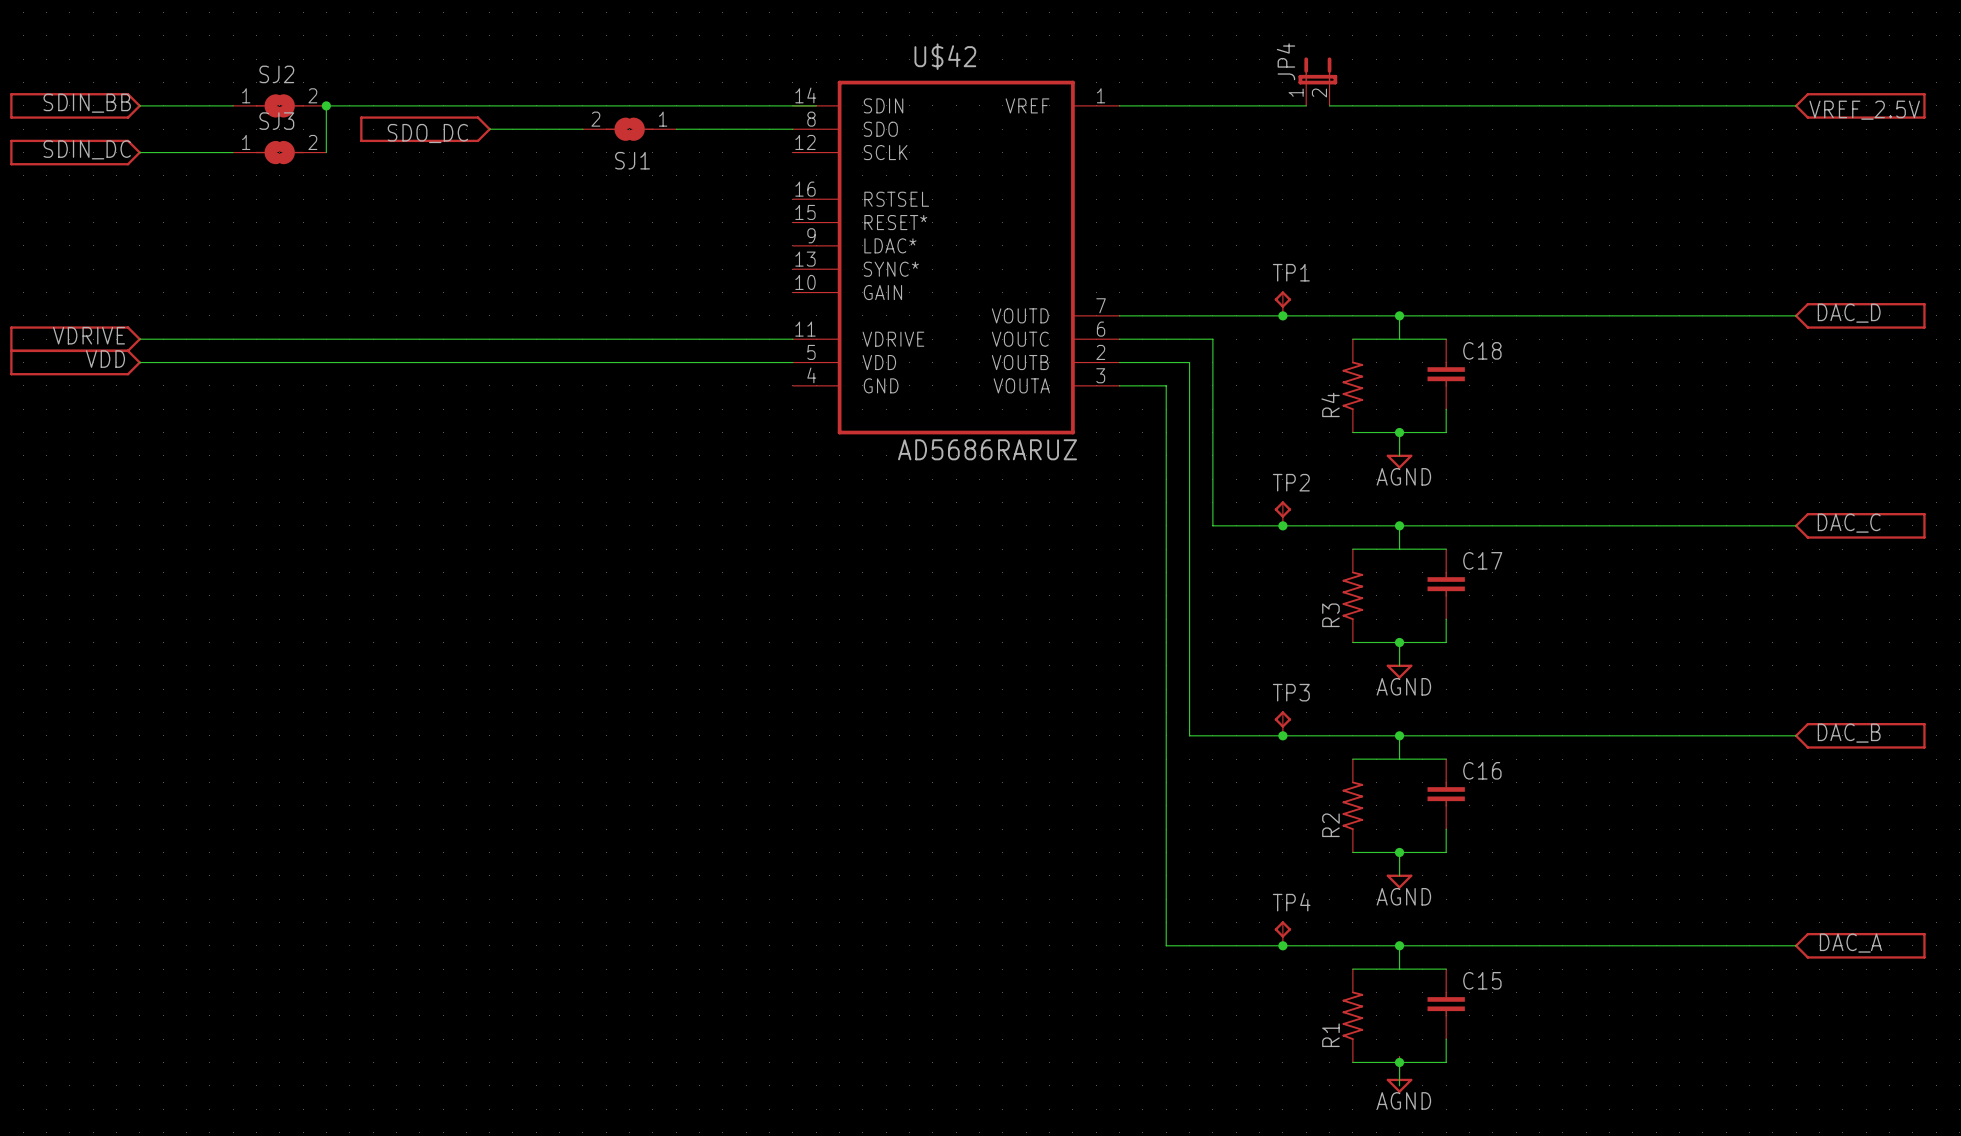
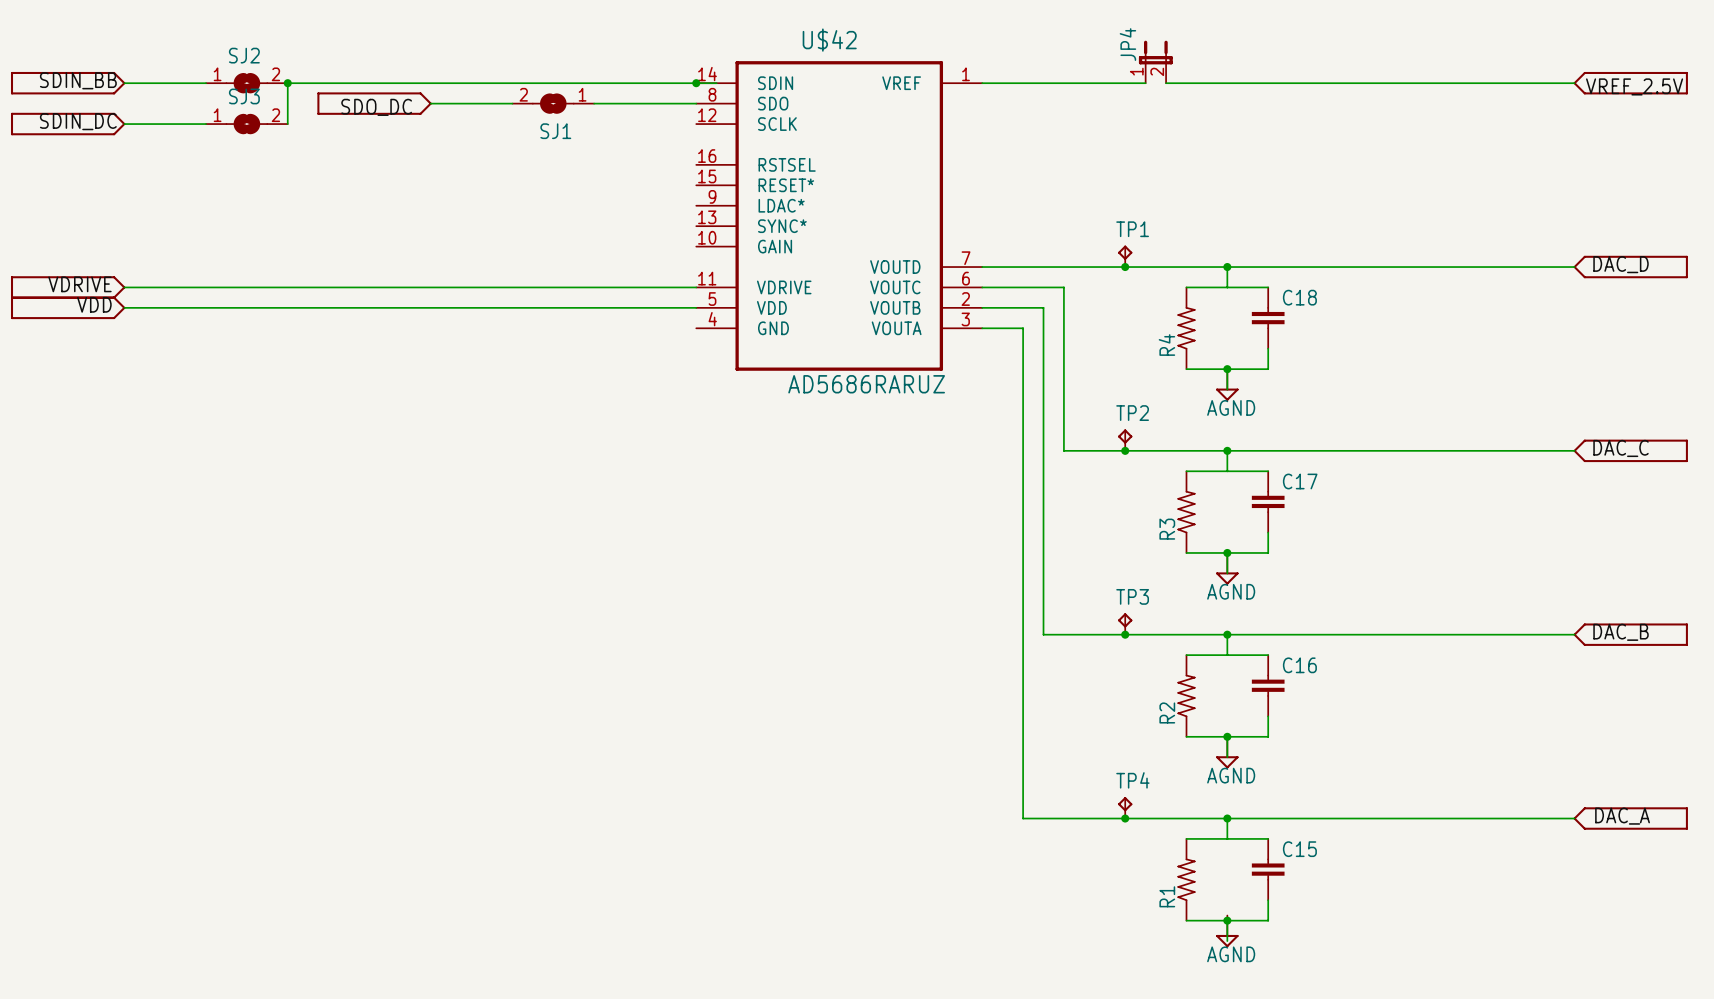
junction: none -> (696, 83)

